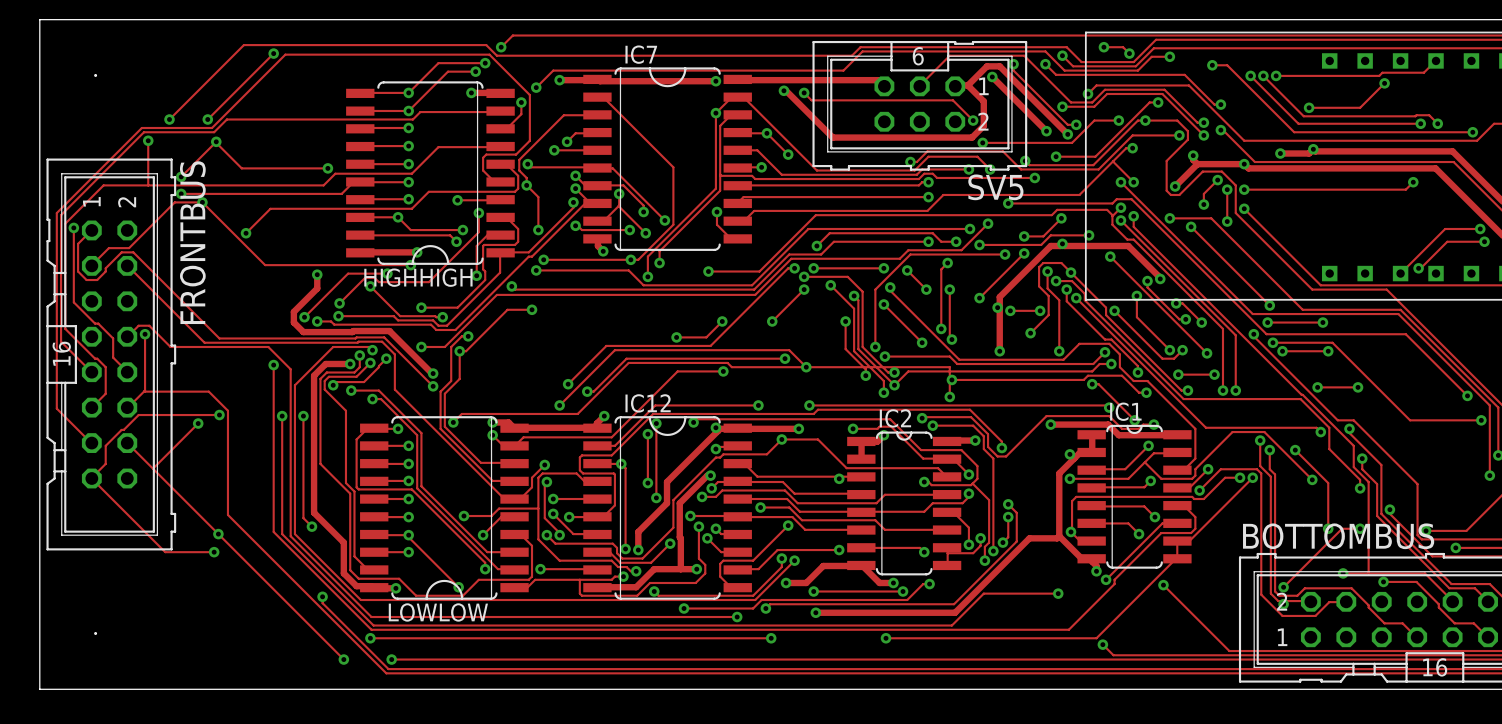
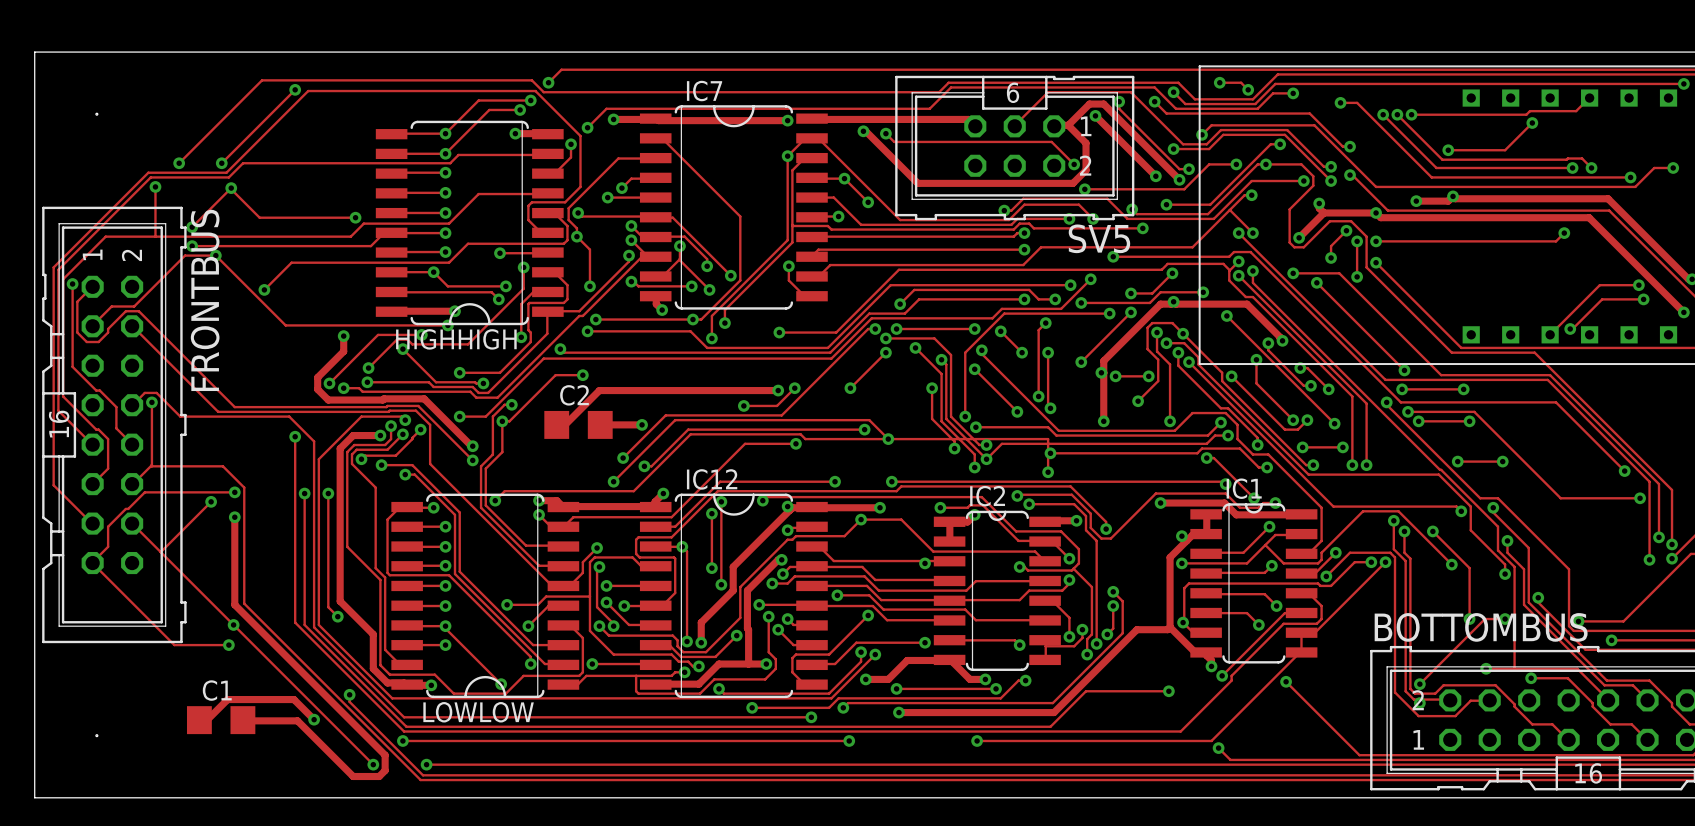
track: none -> (778, 390) (599, 390) (565, 424) (556, 424)
via: none -> (778, 390)
C2: none -> (578, 424)
track: none -> (600, 424) (642, 424)
via: none -> (642, 424)
track: none -> (234, 517) (234, 604) (385, 755) (385, 770) (379, 776) (353, 776) (297, 720) (242, 720)
via: none -> (234, 517)
C1: none -> (221, 720)
track: none -> (314, 719) (293, 699) (227, 699) (207, 719) (199, 720)
via: none -> (314, 719)

